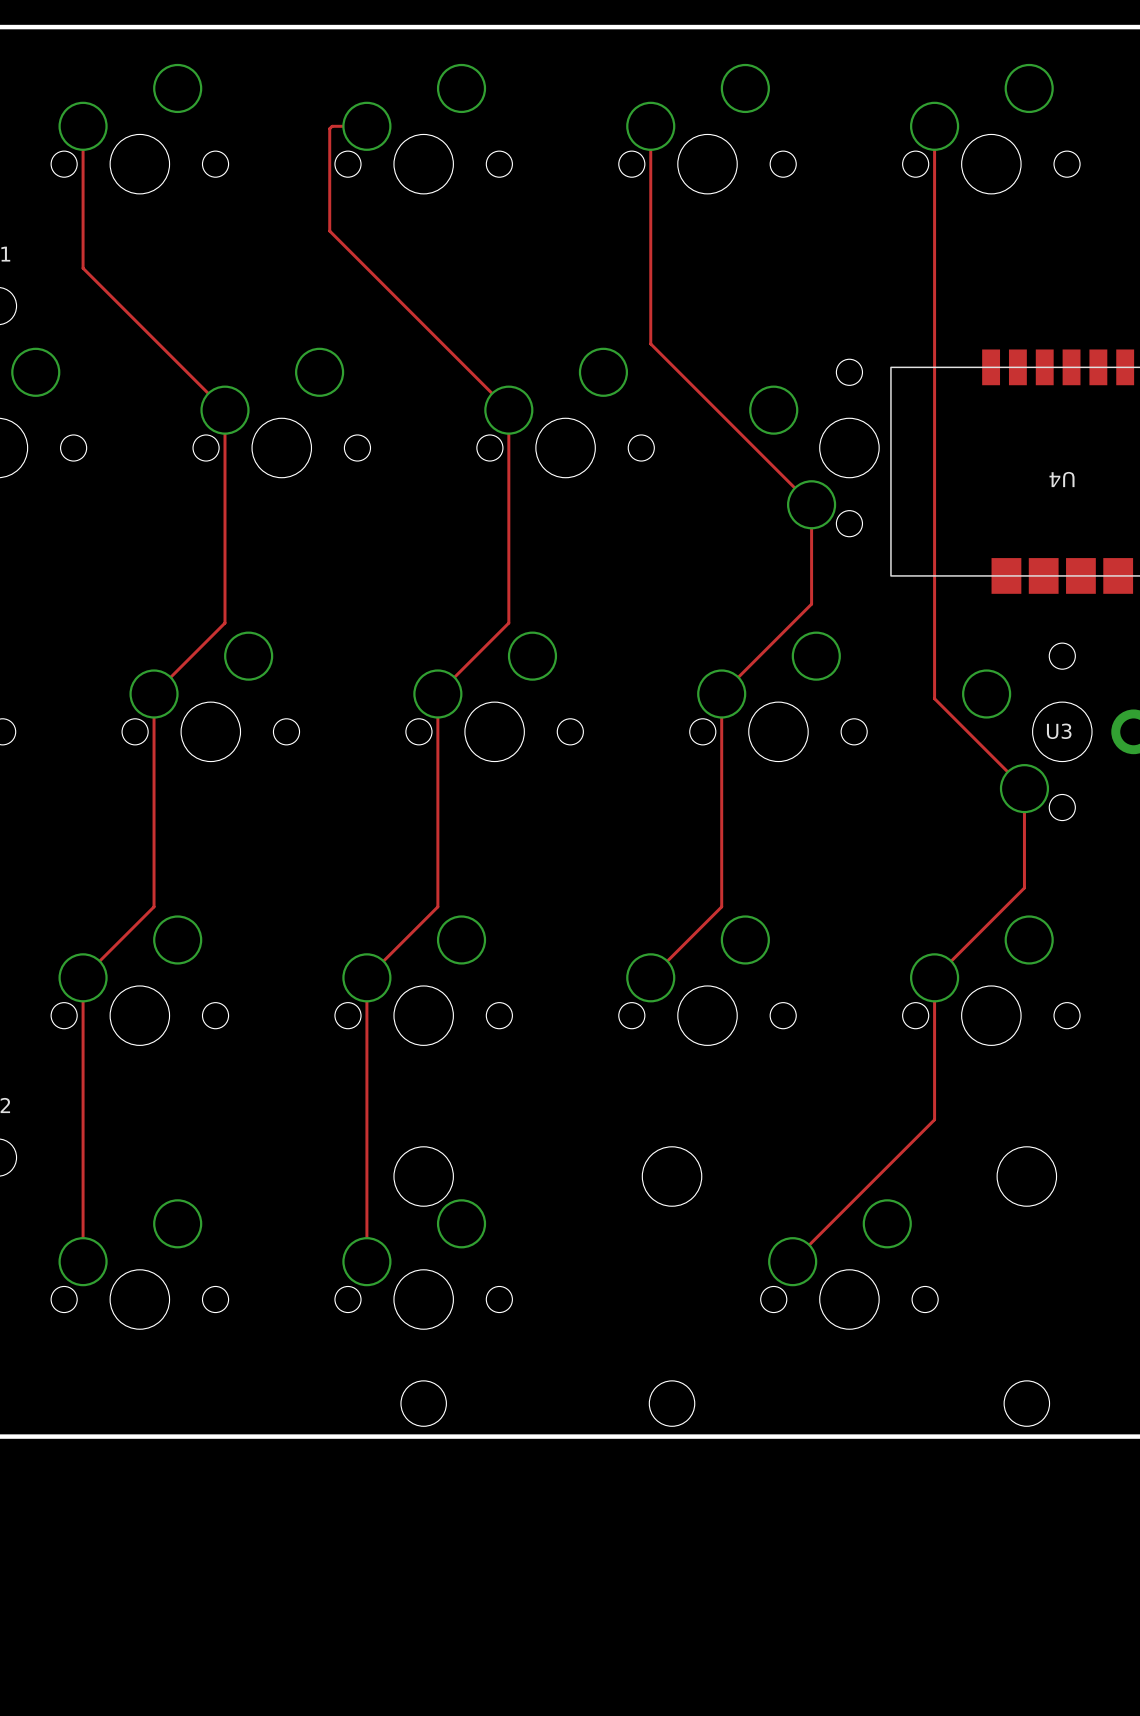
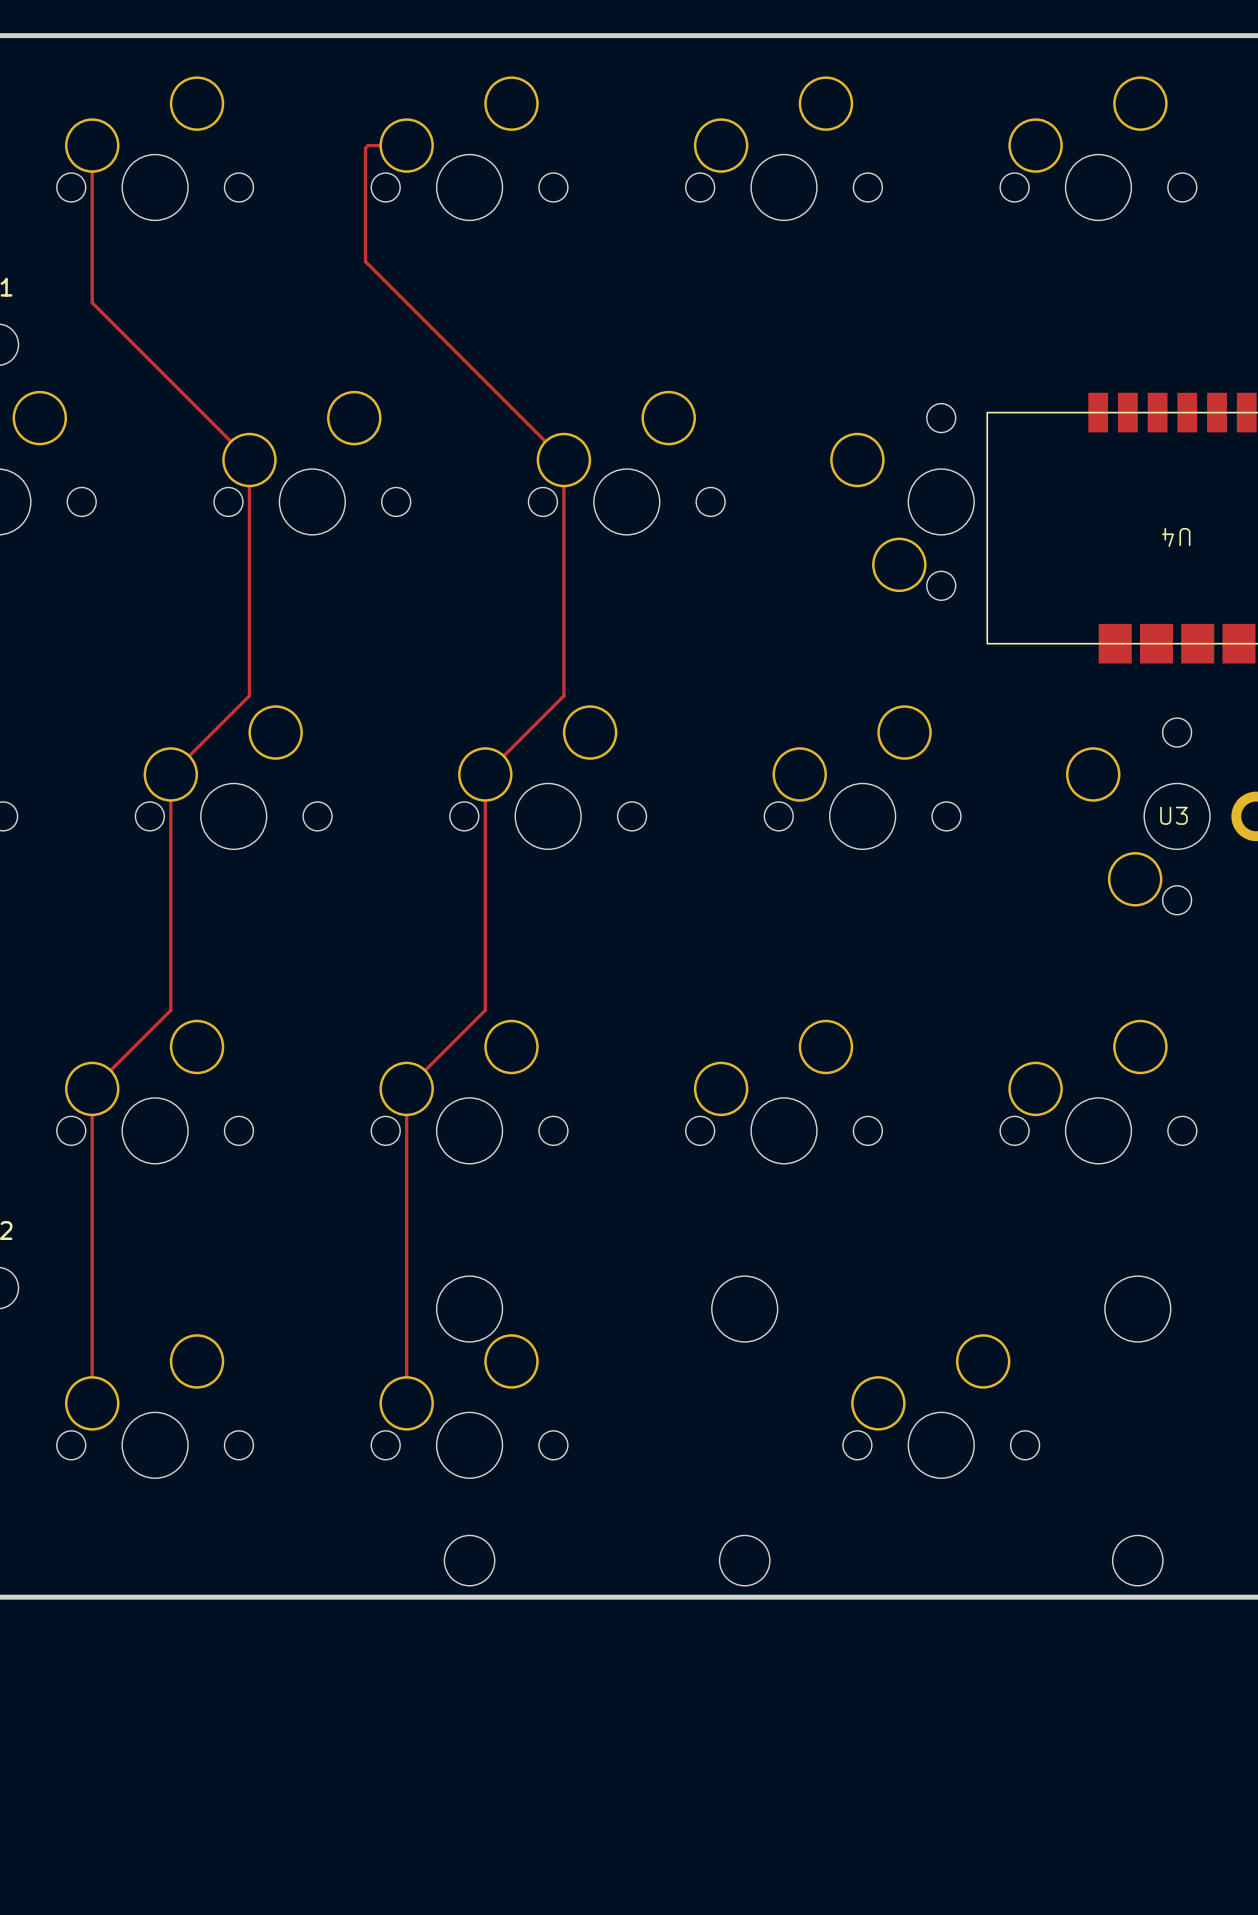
track: (650, 126) (650, 343) (811, 504) (811, 604) (721, 693) (721, 906) (650, 977) -> none
track: (934, 126) (934, 698) (1024, 788) (1024, 887) (934, 977) (934, 1119) (792, 1261) -> none

